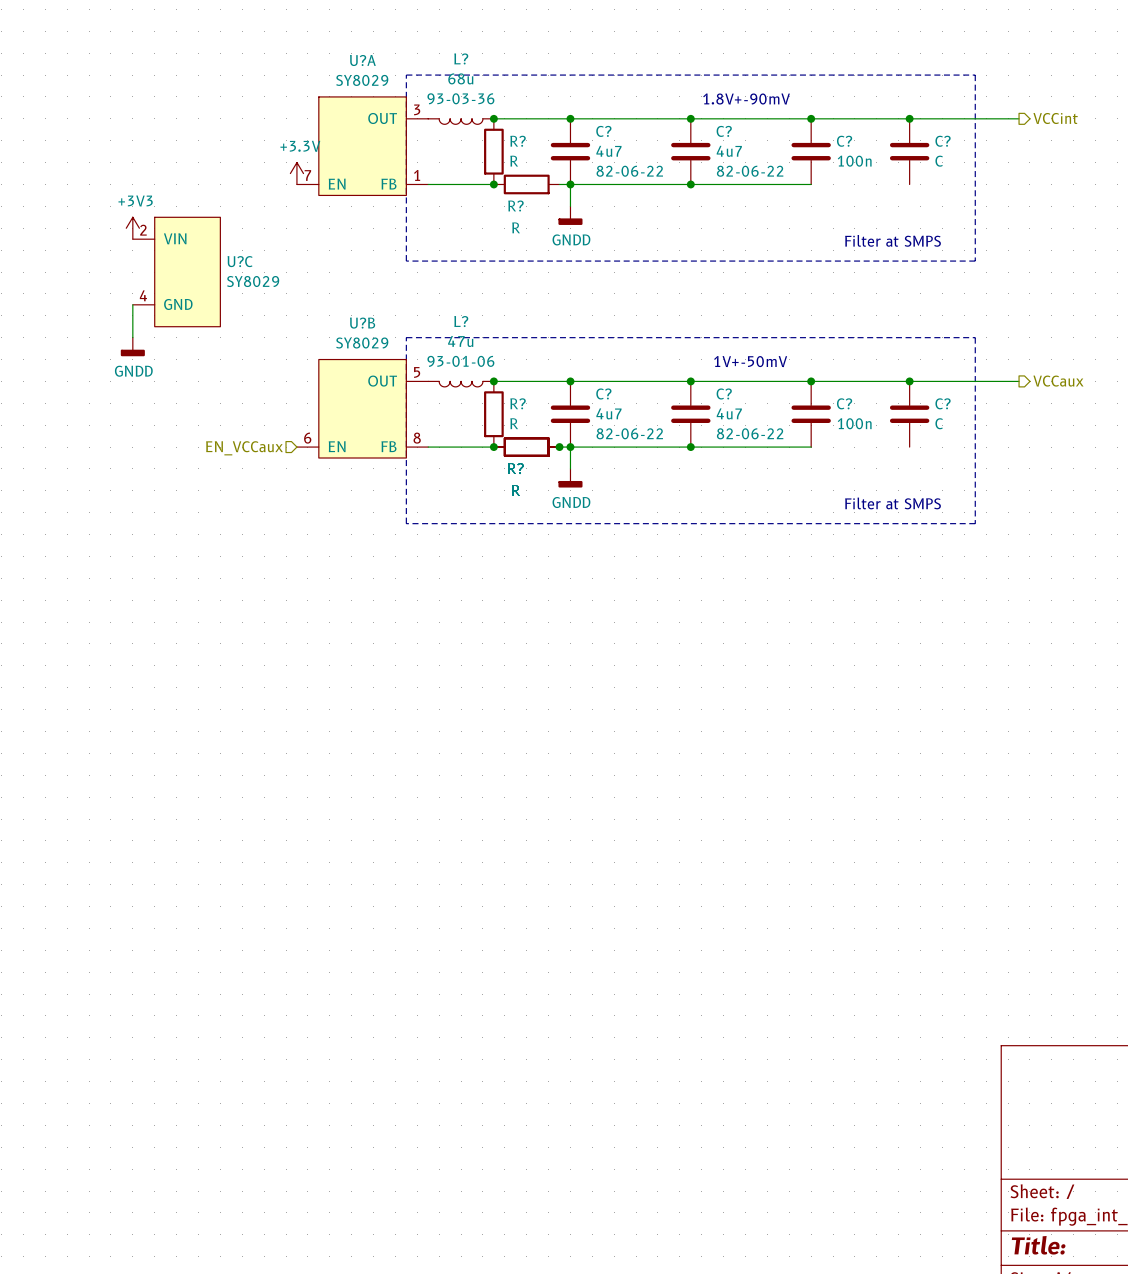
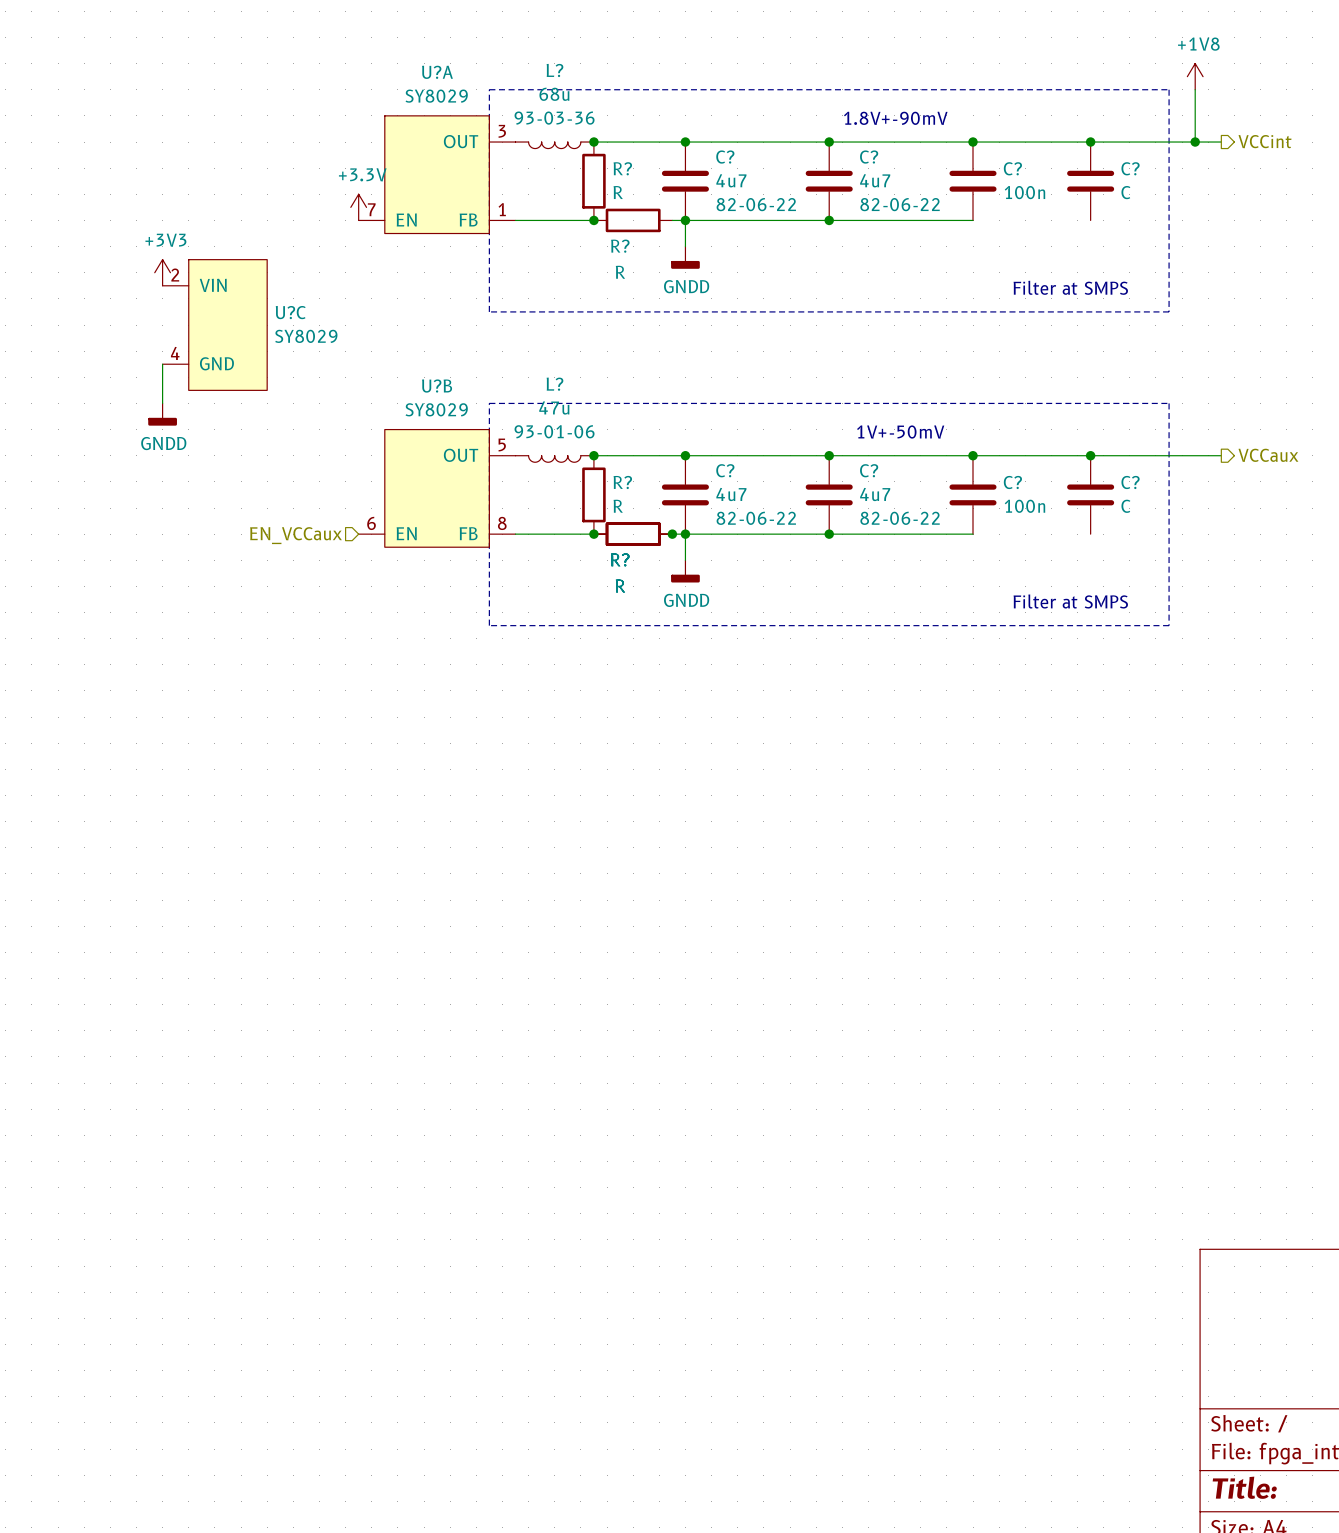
power symbol: none -> +1V8 (1195, 76)
wire: none -> (1195, 89) (1195, 142)
junction: none -> (1195, 142)

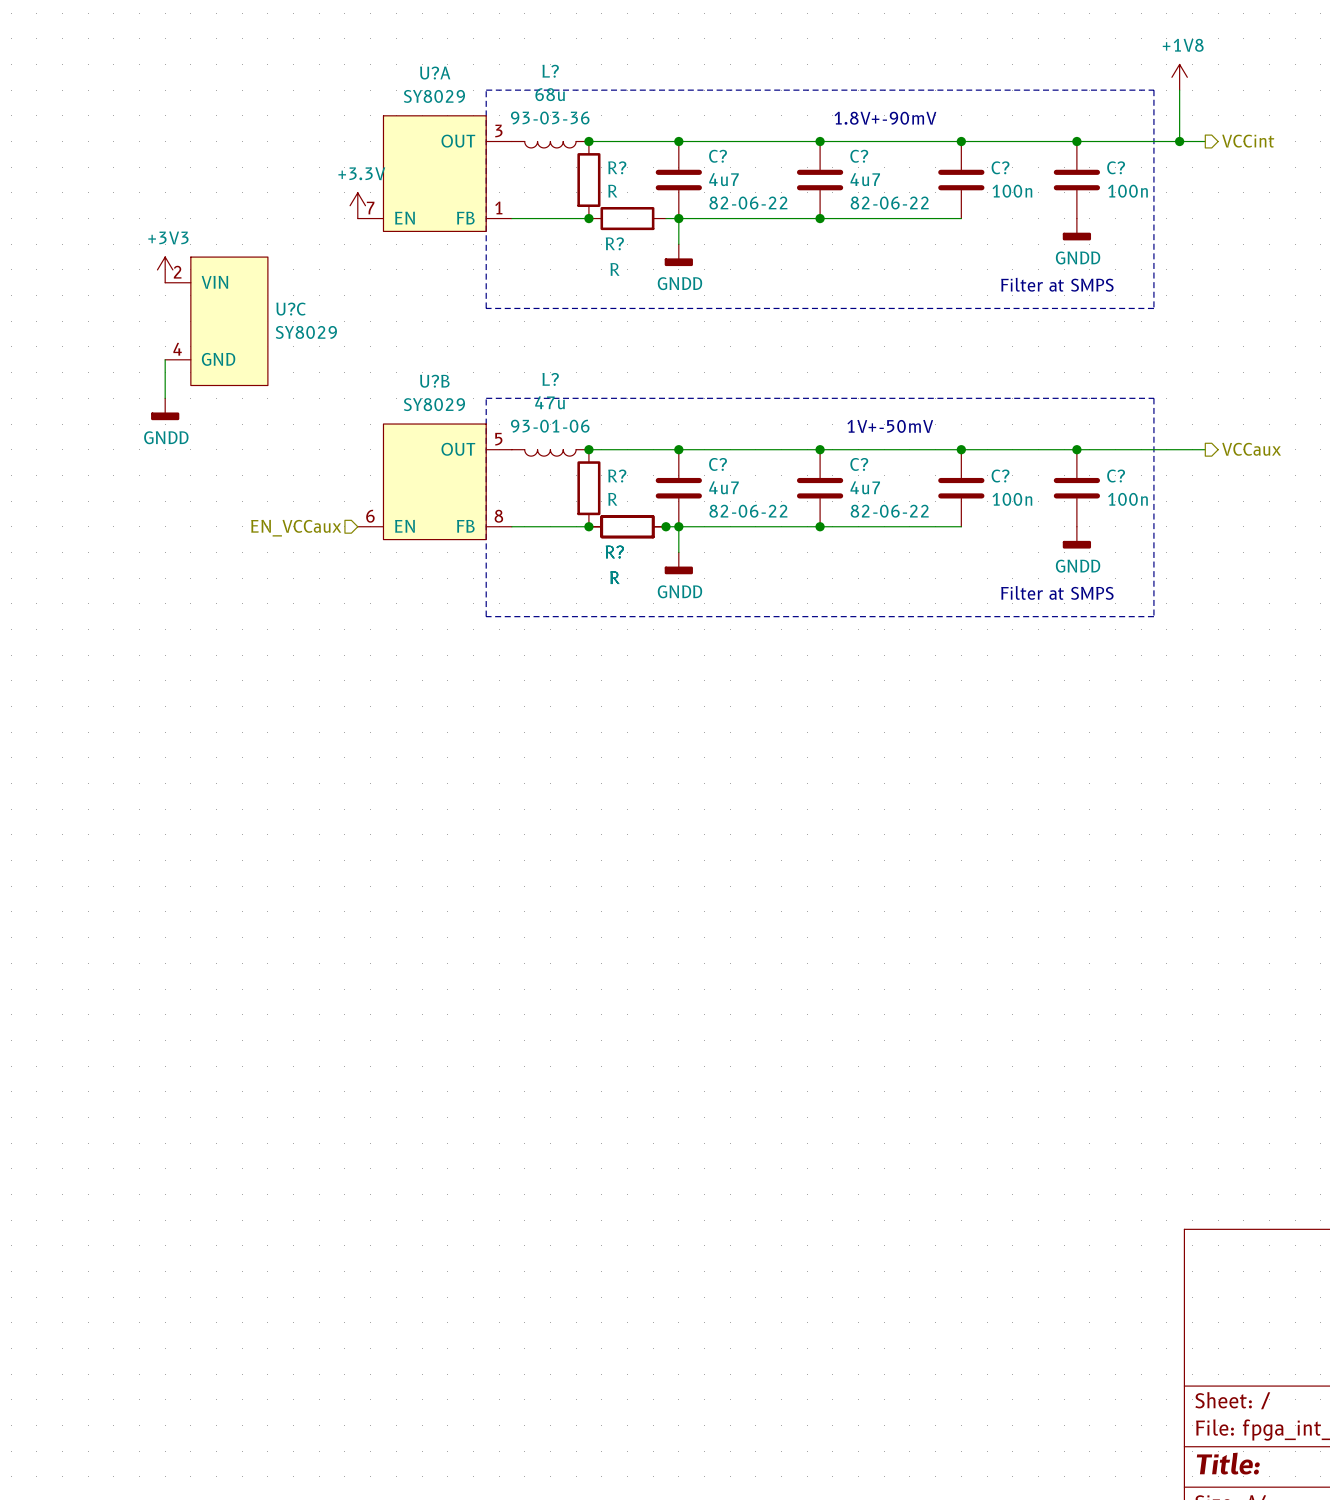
C? value: C (1125, 192) -> 100n (1127, 191)
power symbol: none -> GNDD (1076, 229)
C? value: C (1125, 506) -> 100n (1127, 499)
power symbol: none -> GNDD (1076, 537)

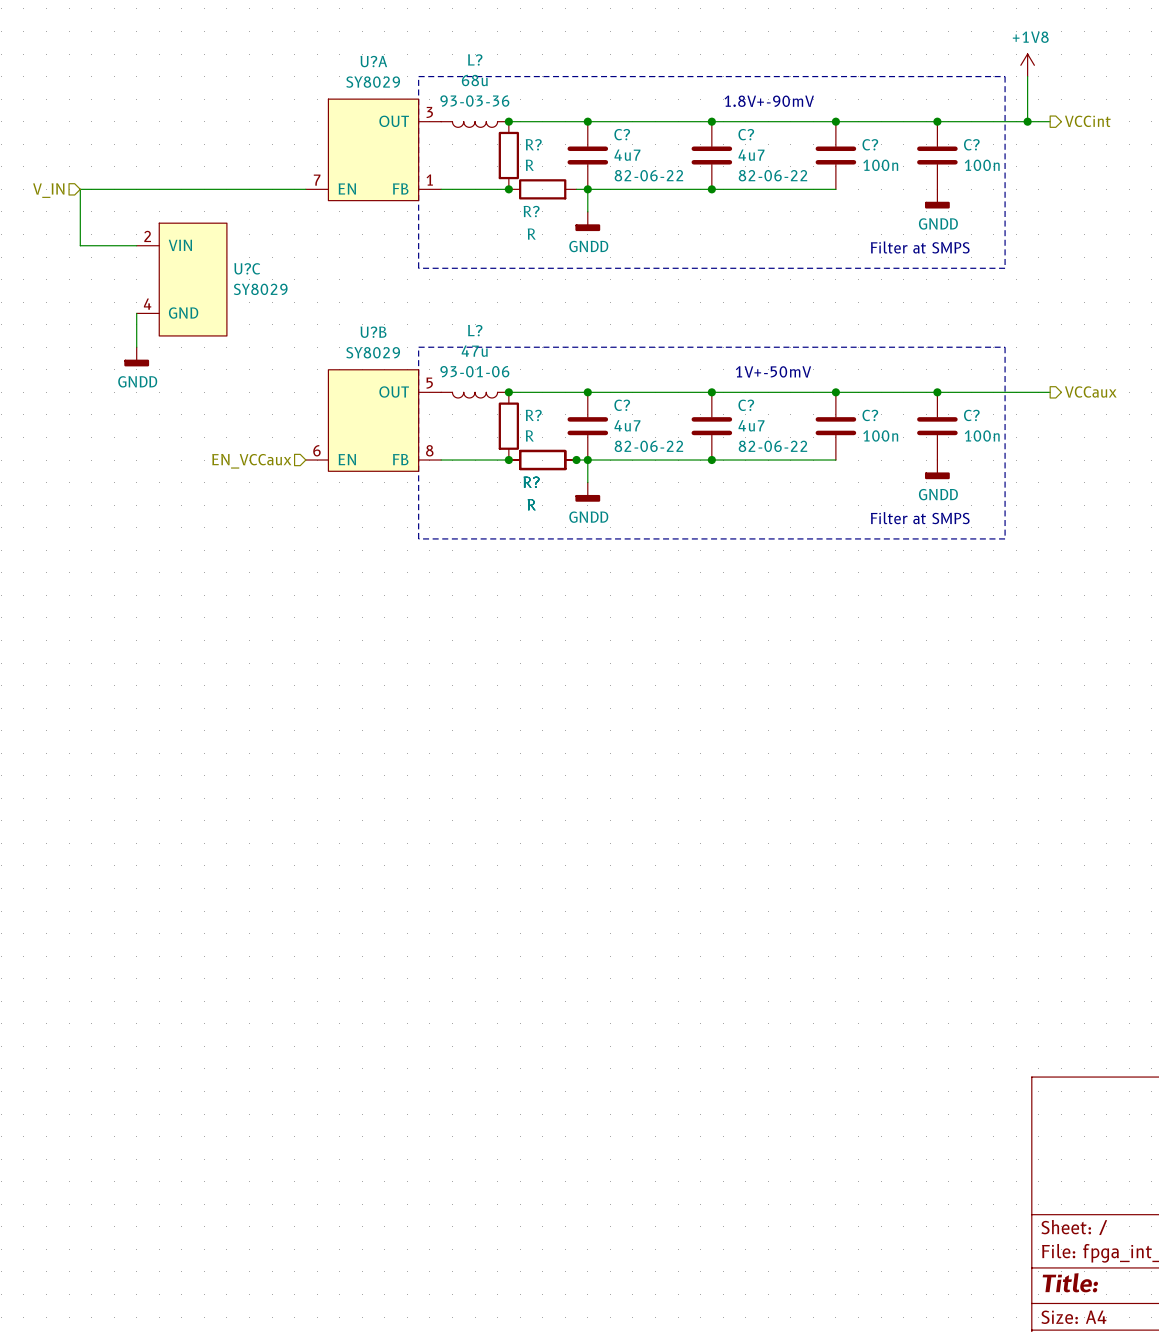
power symbol: +3.3V (357, 205) -> none
wire: none -> (305, 189) (80, 189) (80, 245) (136, 245)
hierarchical label: none -> V_IN (48, 190)
power symbol: +3V3 (165, 269) -> none

